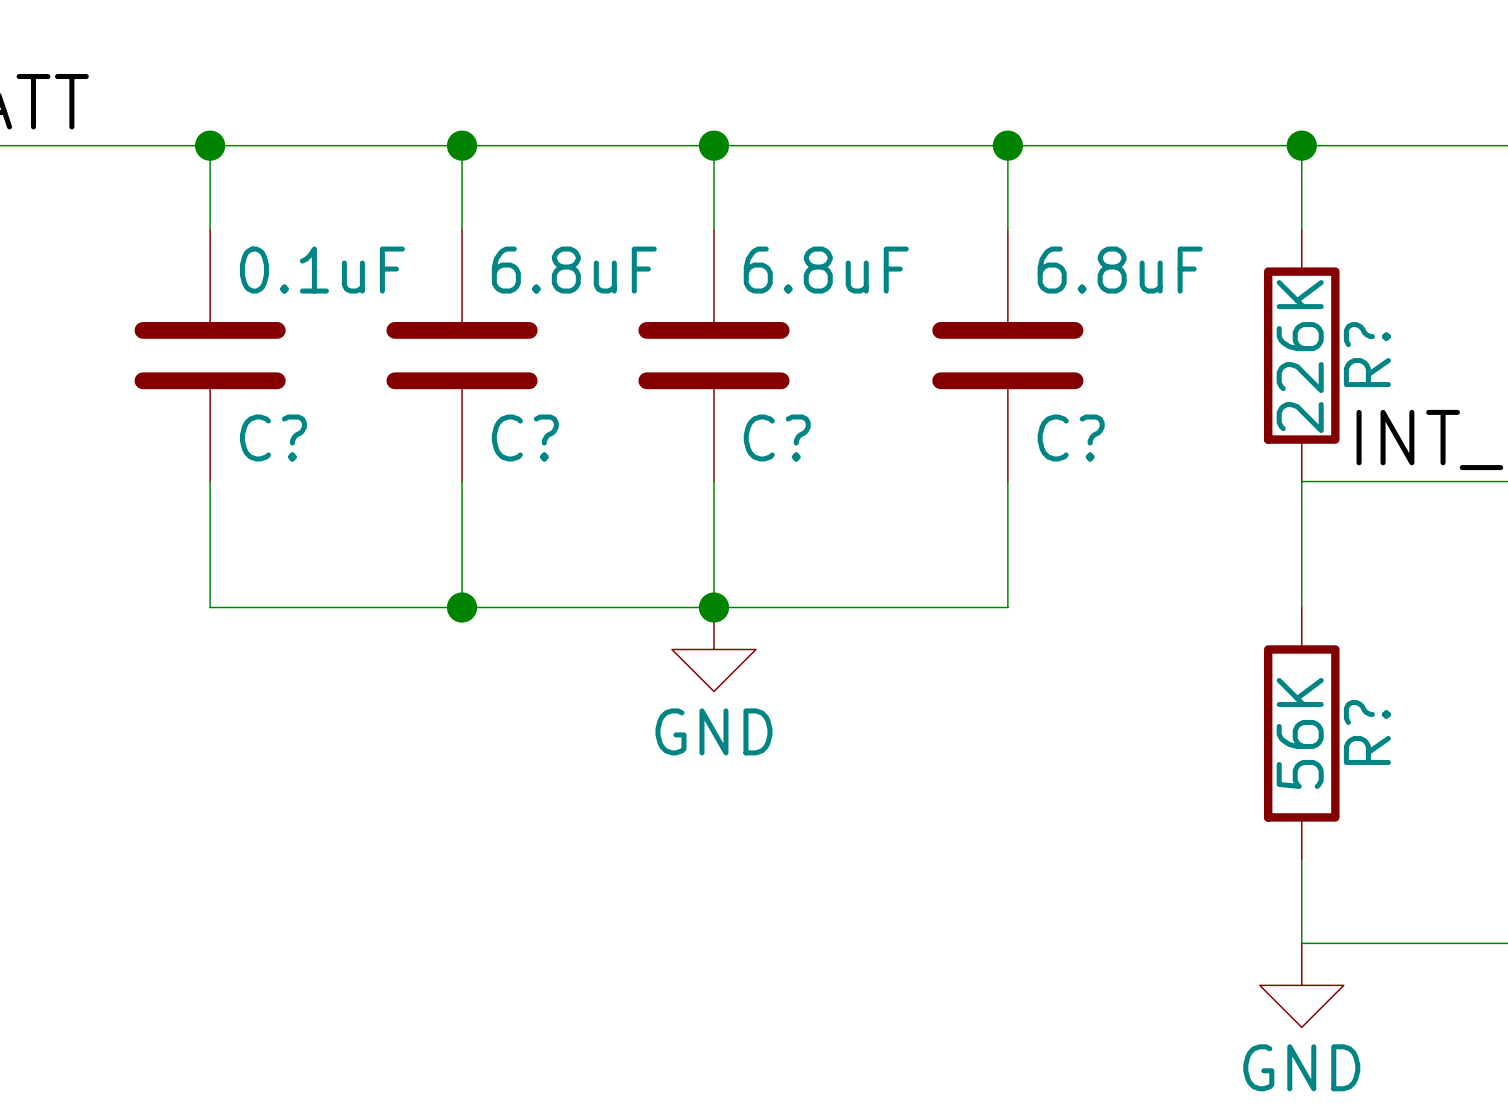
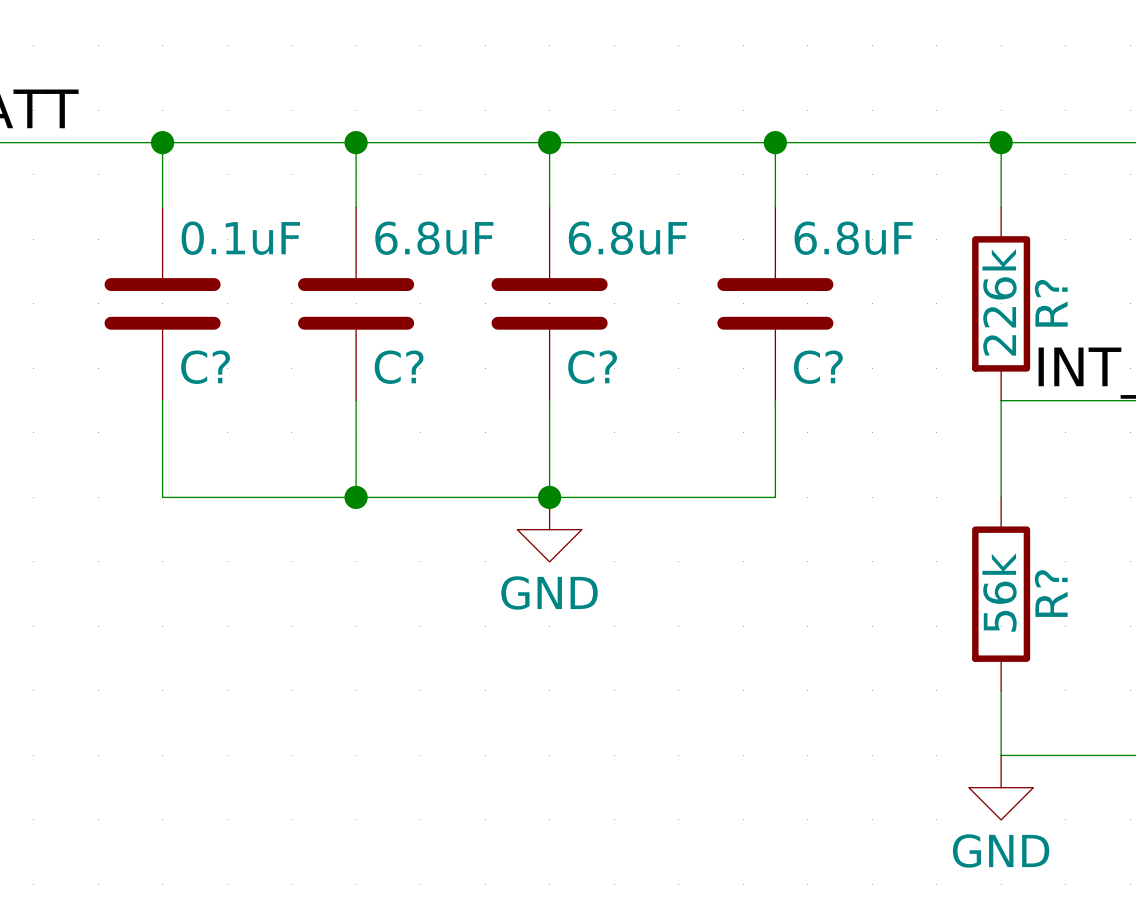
R? value: 226K (1300, 356) -> 226k (999, 302)
R? value: 56K (1300, 733) -> 56k (999, 592)

